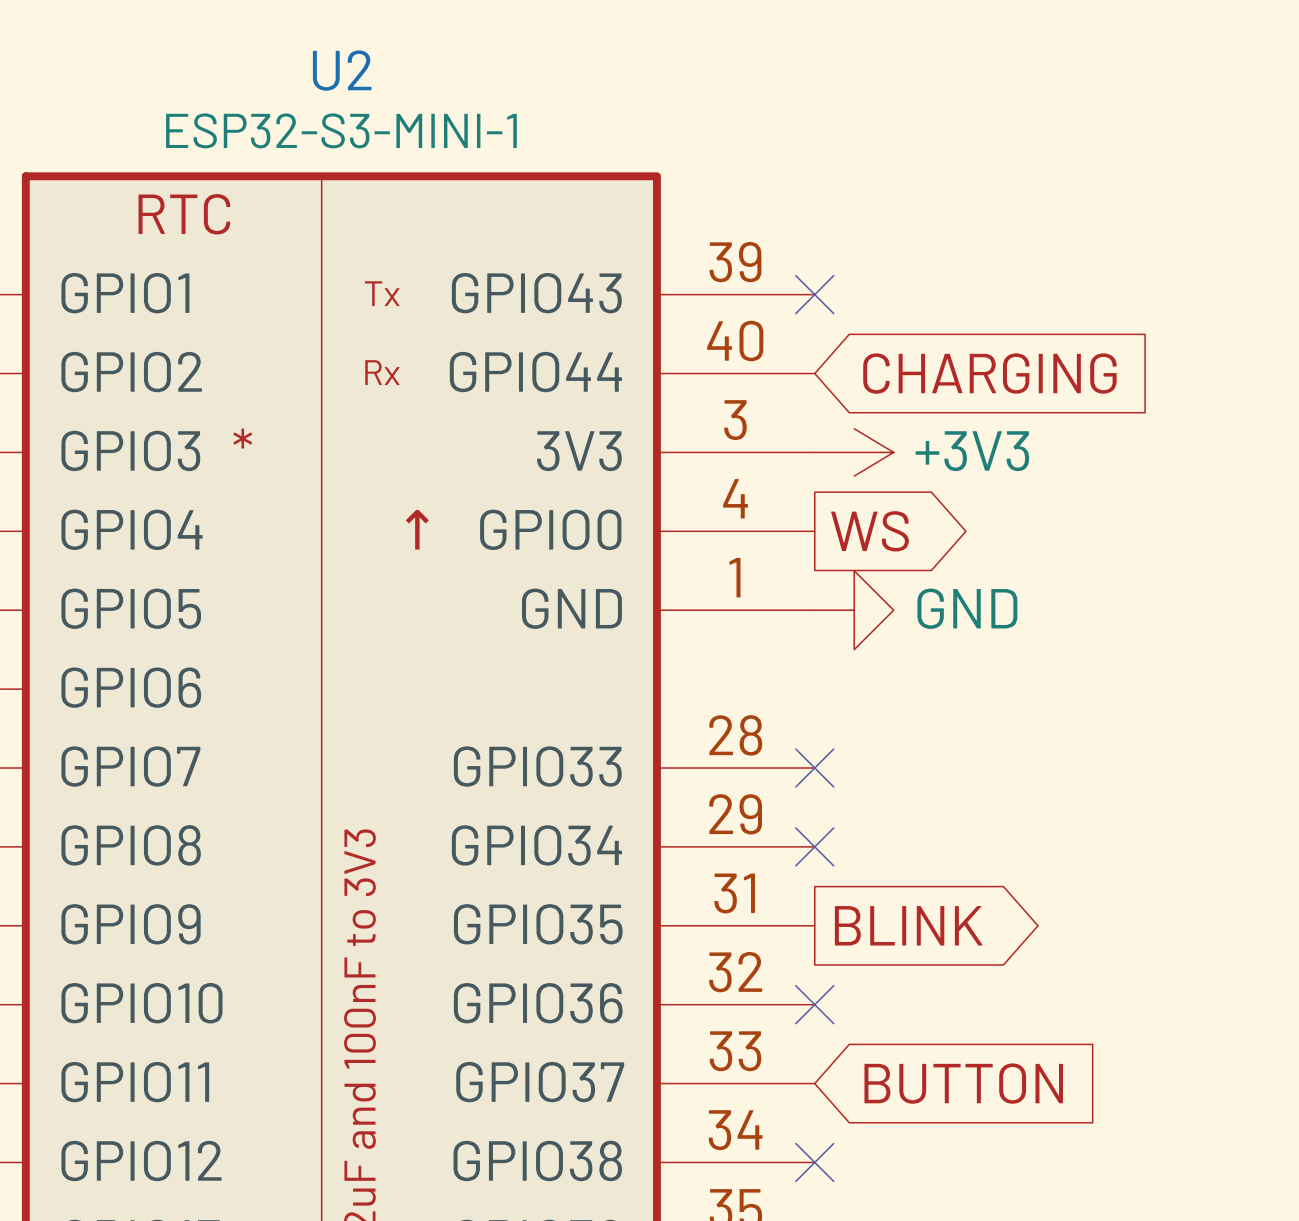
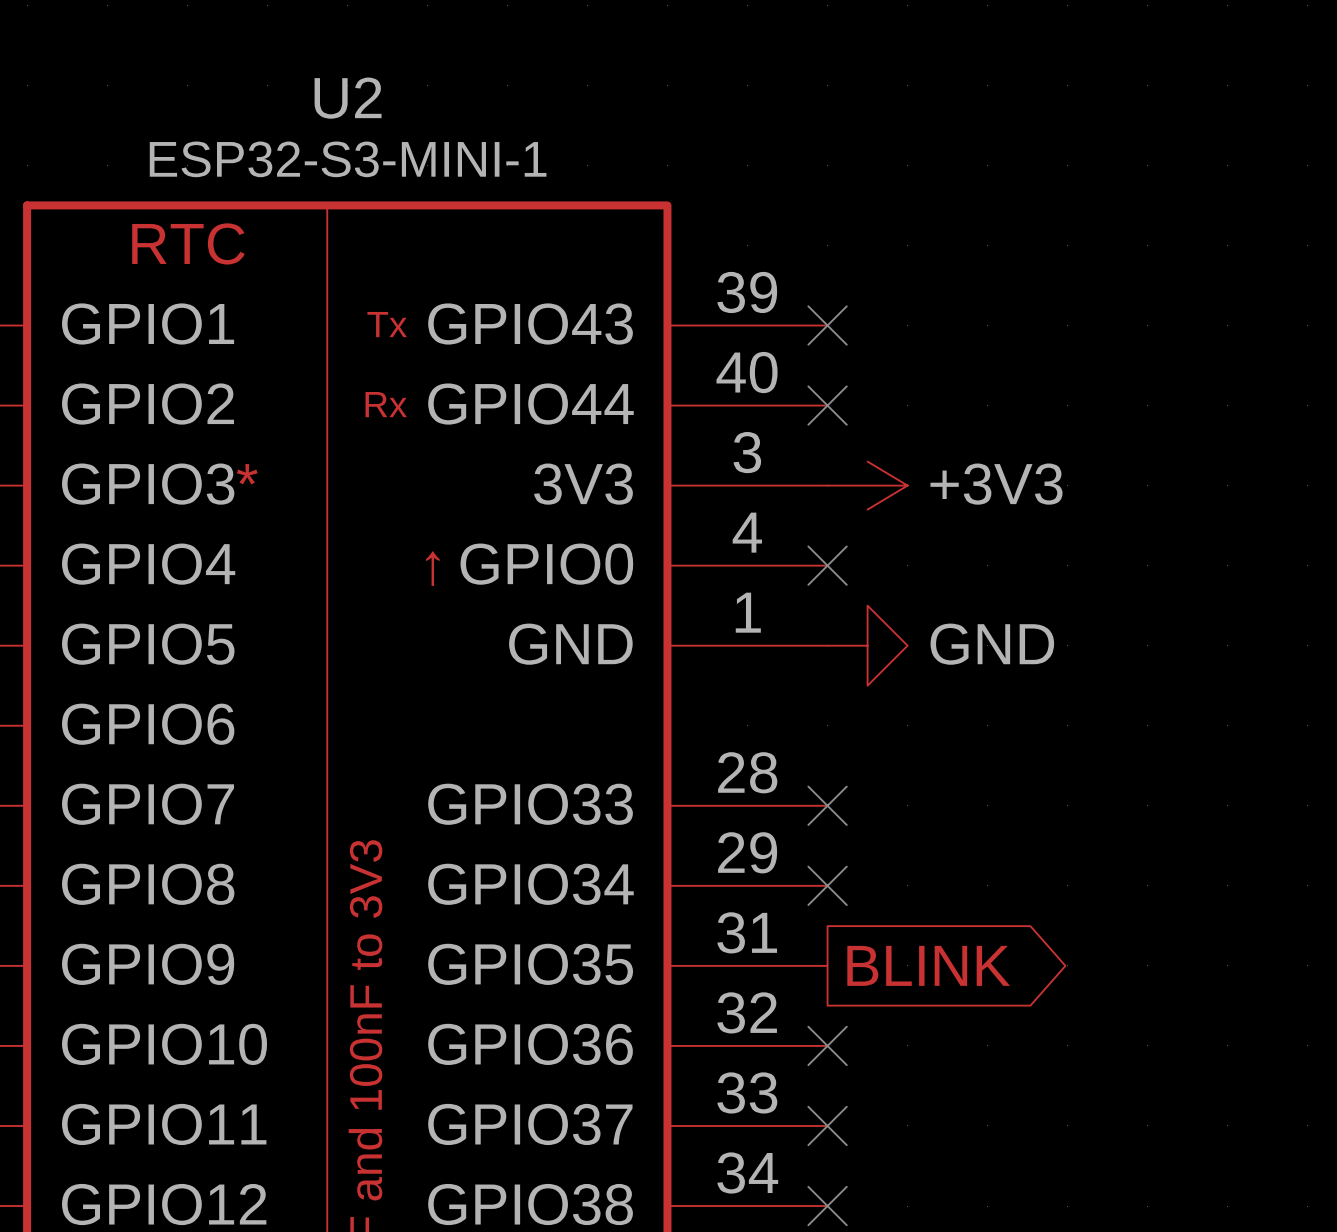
no-connect mark: none -> (827, 405)
global label: CHARGING (989, 373) -> none
no-connect mark: none -> (827, 565)
global label: WS (870, 531) -> none
no-connect mark: none -> (827, 1125)
global label: BUTTON (963, 1083) -> none

